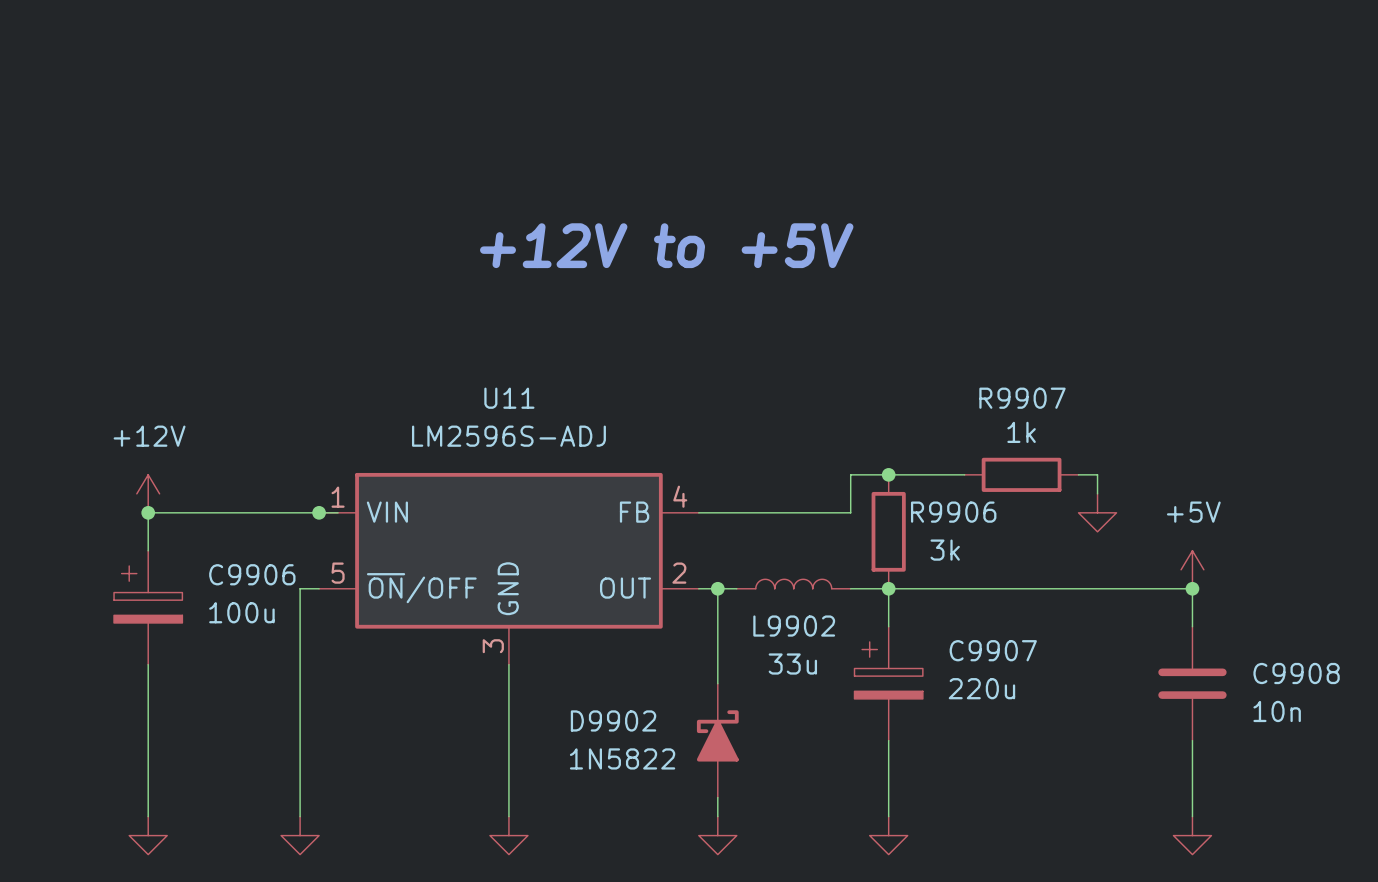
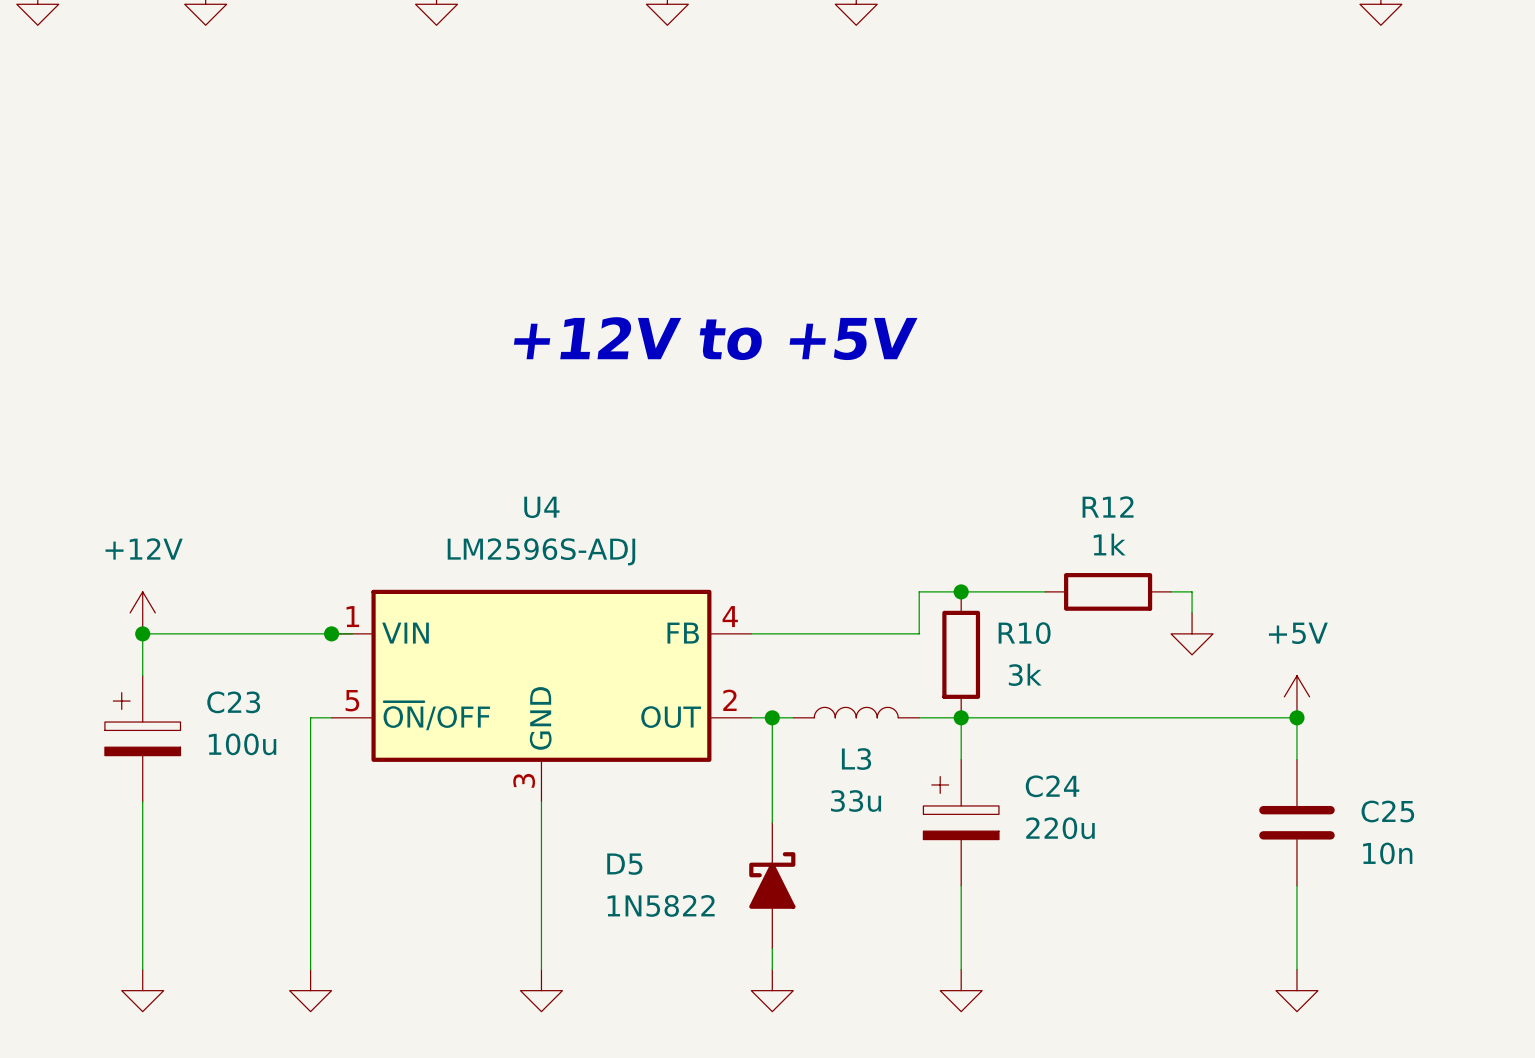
U11 name: U11 (509, 398) -> U4 (541, 507)
R9907 name: R9907 (1022, 398) -> R12 (1108, 506)
R9906 name: R9906 (953, 512) -> R10 (1024, 633)
C9906 name: C9906 (252, 574) -> C23 (233, 702)
L9902 name: L9902 (794, 626) -> L3 (856, 759)
C9907 name: C9907 (993, 650) -> C24 (1052, 786)
C9908 name: C9908 (1296, 673) -> C25 (1387, 811)
D9902 name: D9902 (613, 720) -> D5 (624, 864)

